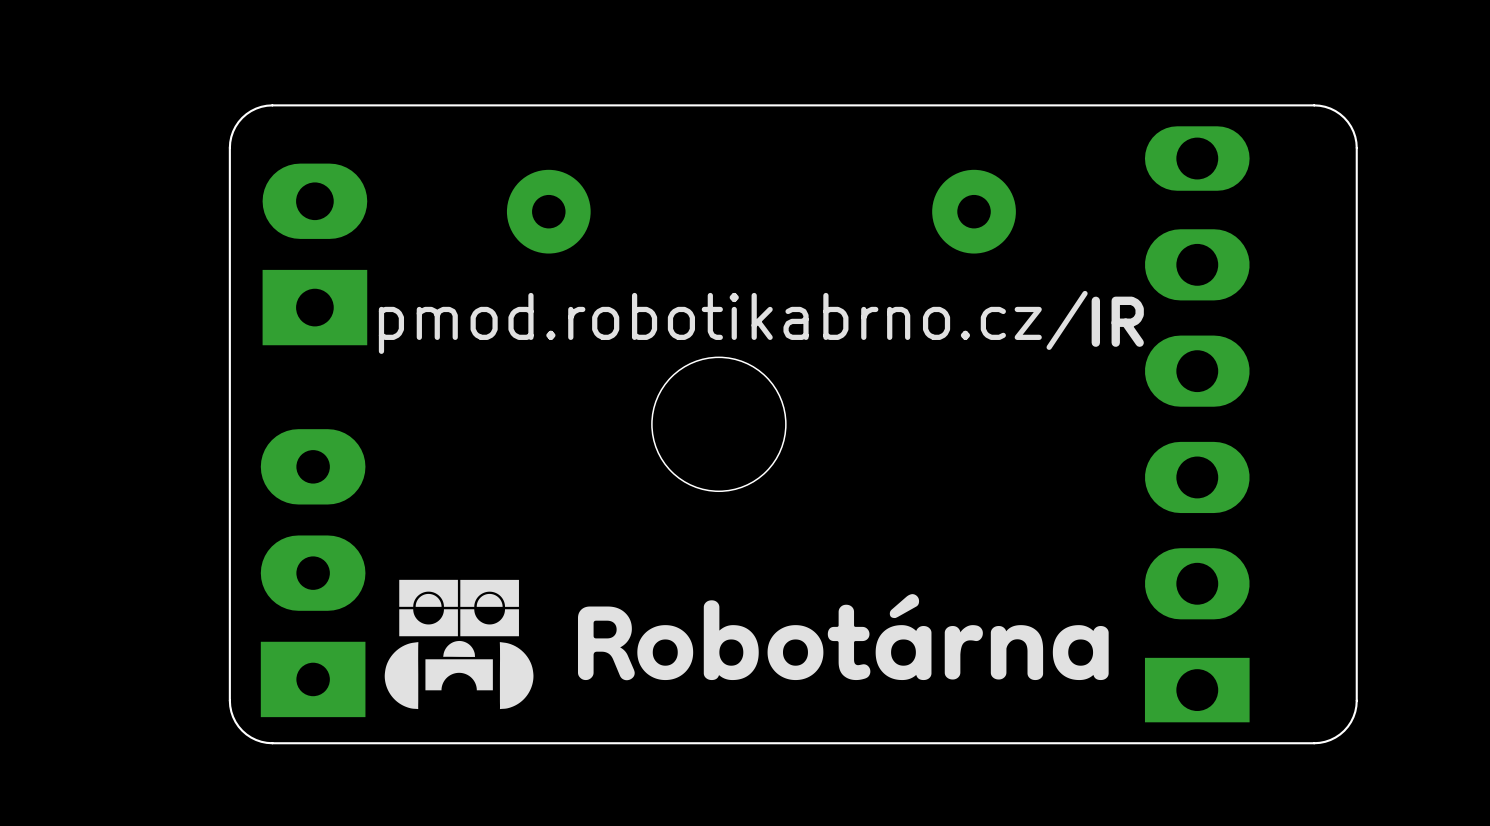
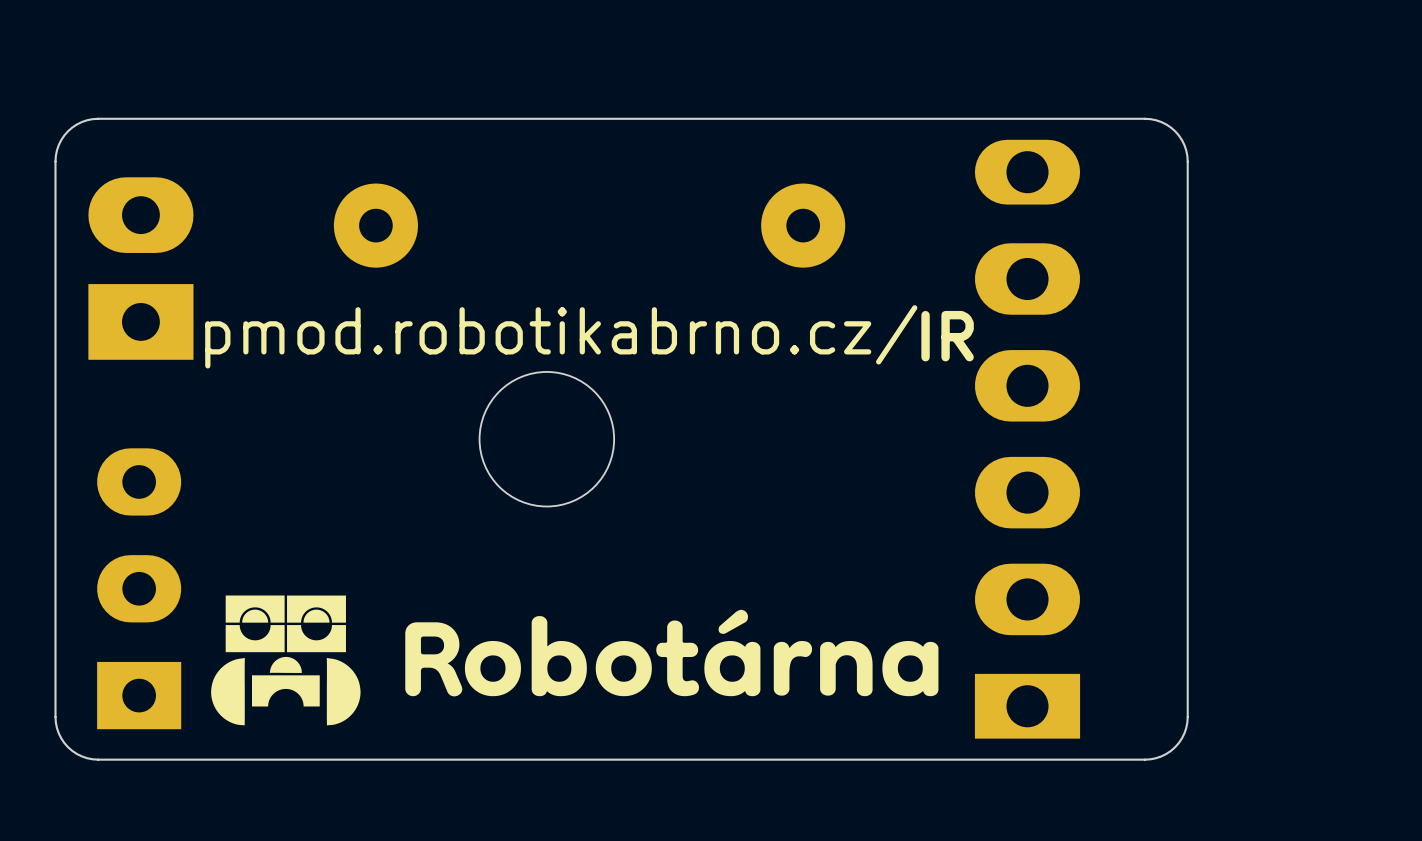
part footprint: [260, 429, 366, 718] -> [97, 448, 182, 730]

